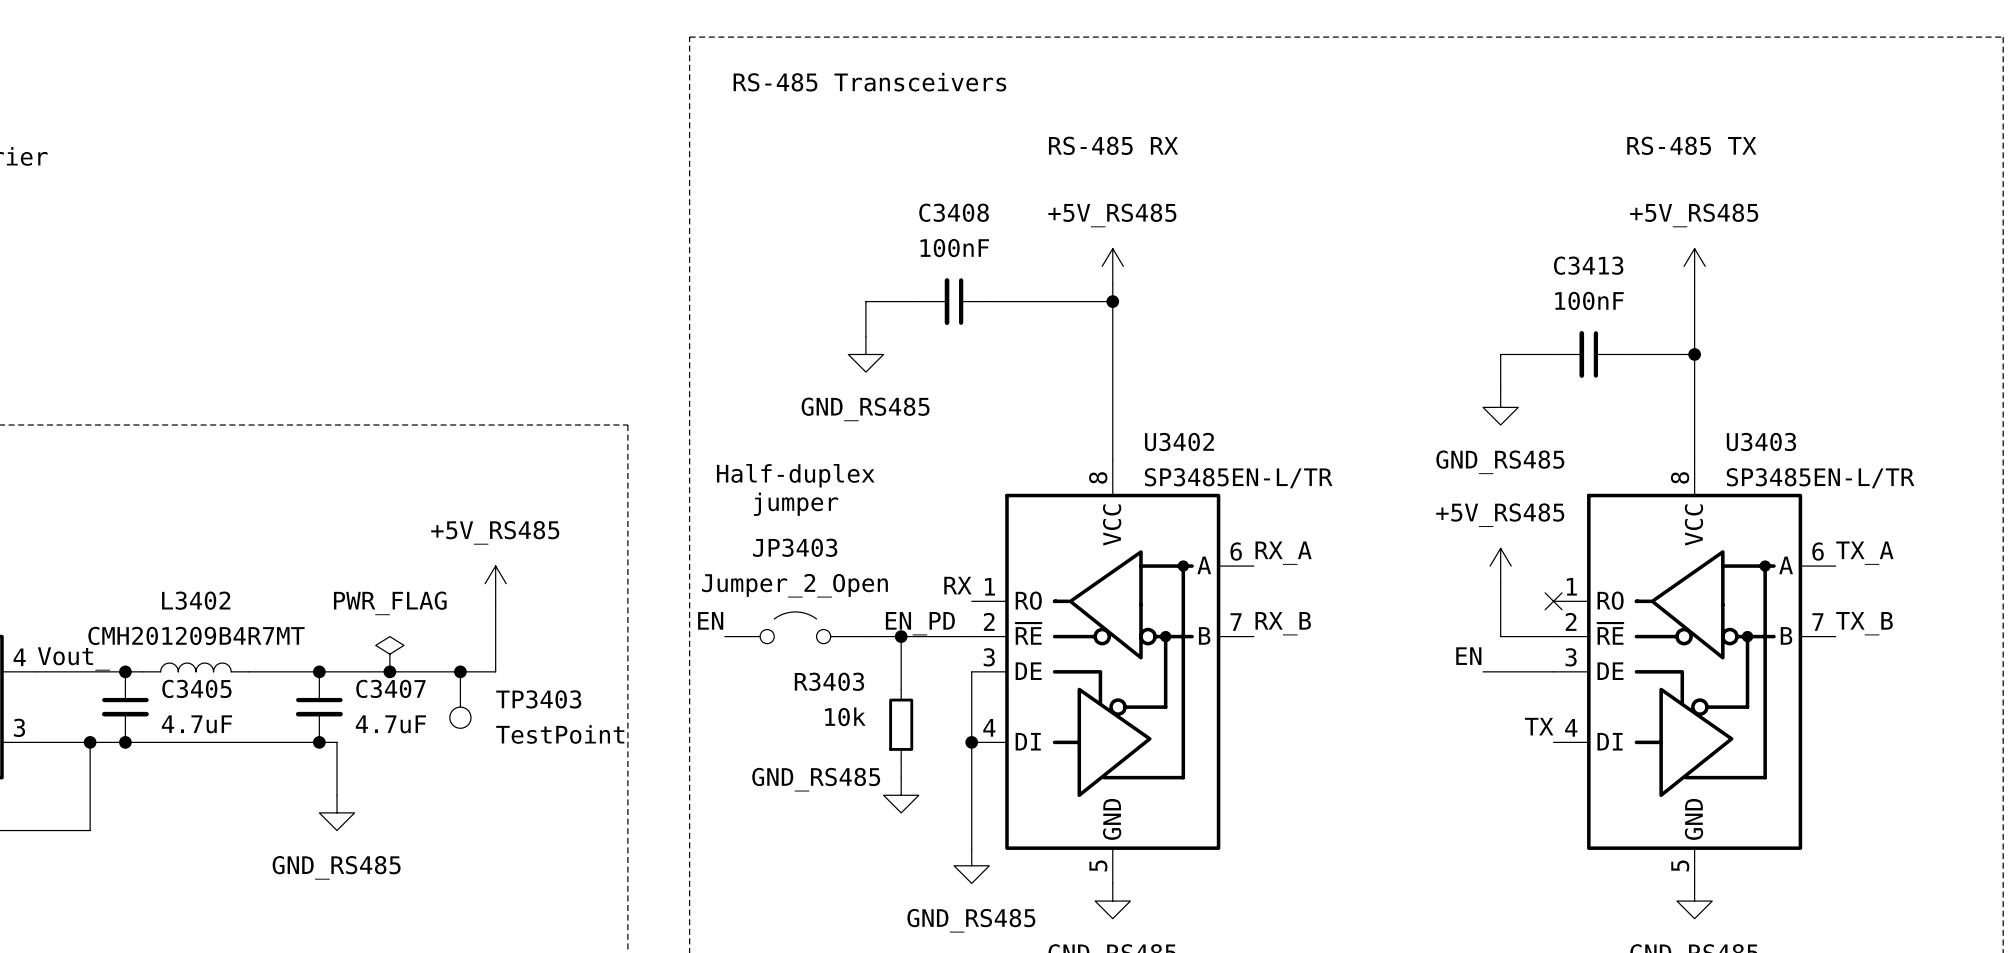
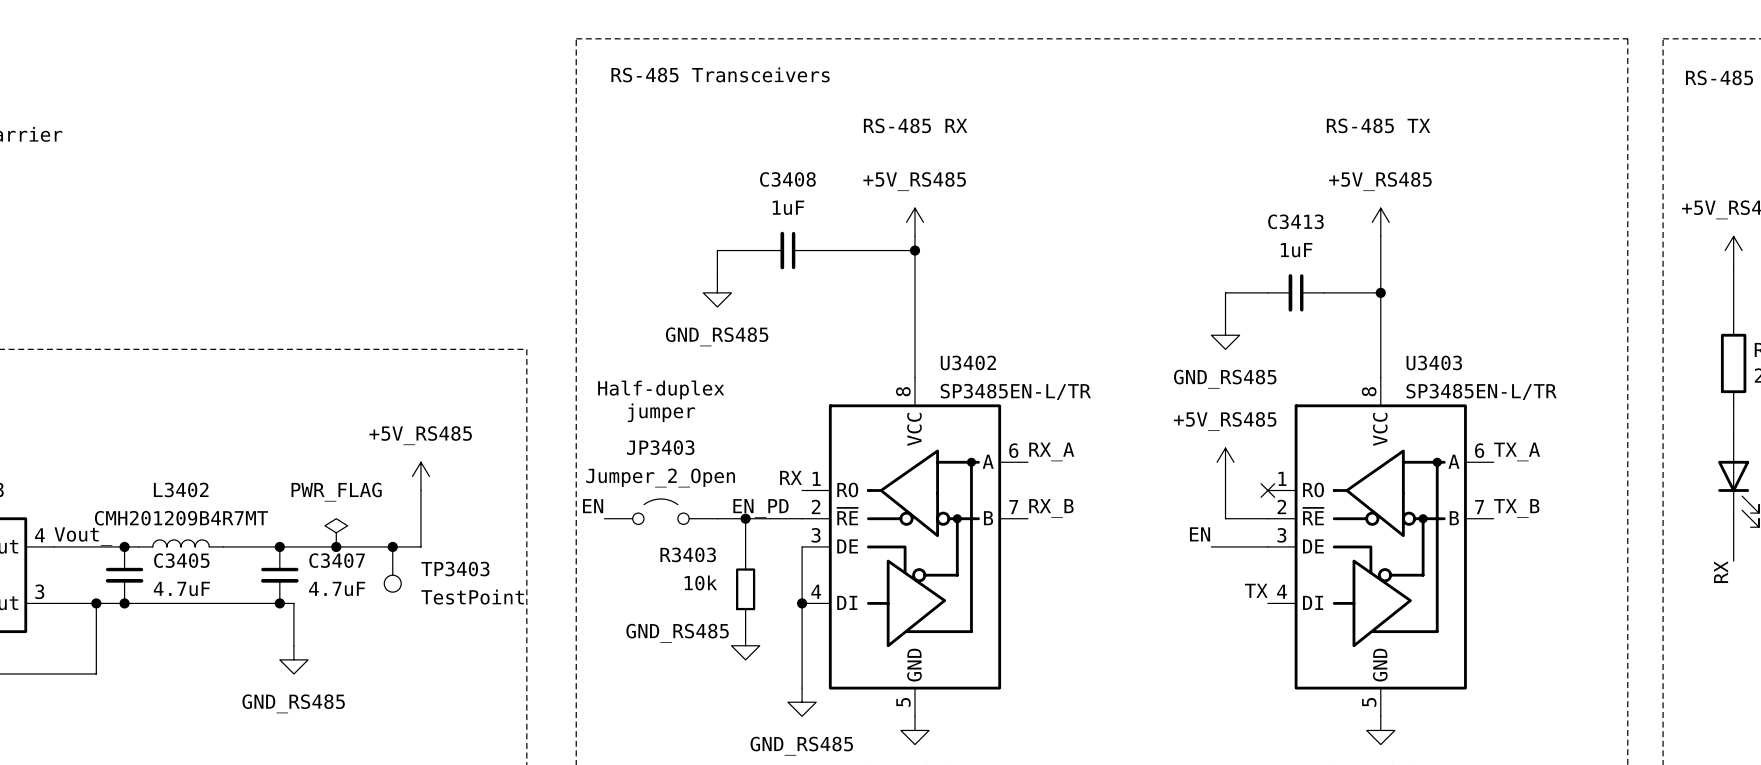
C3408 value: 100nF (954, 248) -> 1uF (788, 207)
C3413 value: 100nF (1589, 300) -> 1uF (1296, 250)

